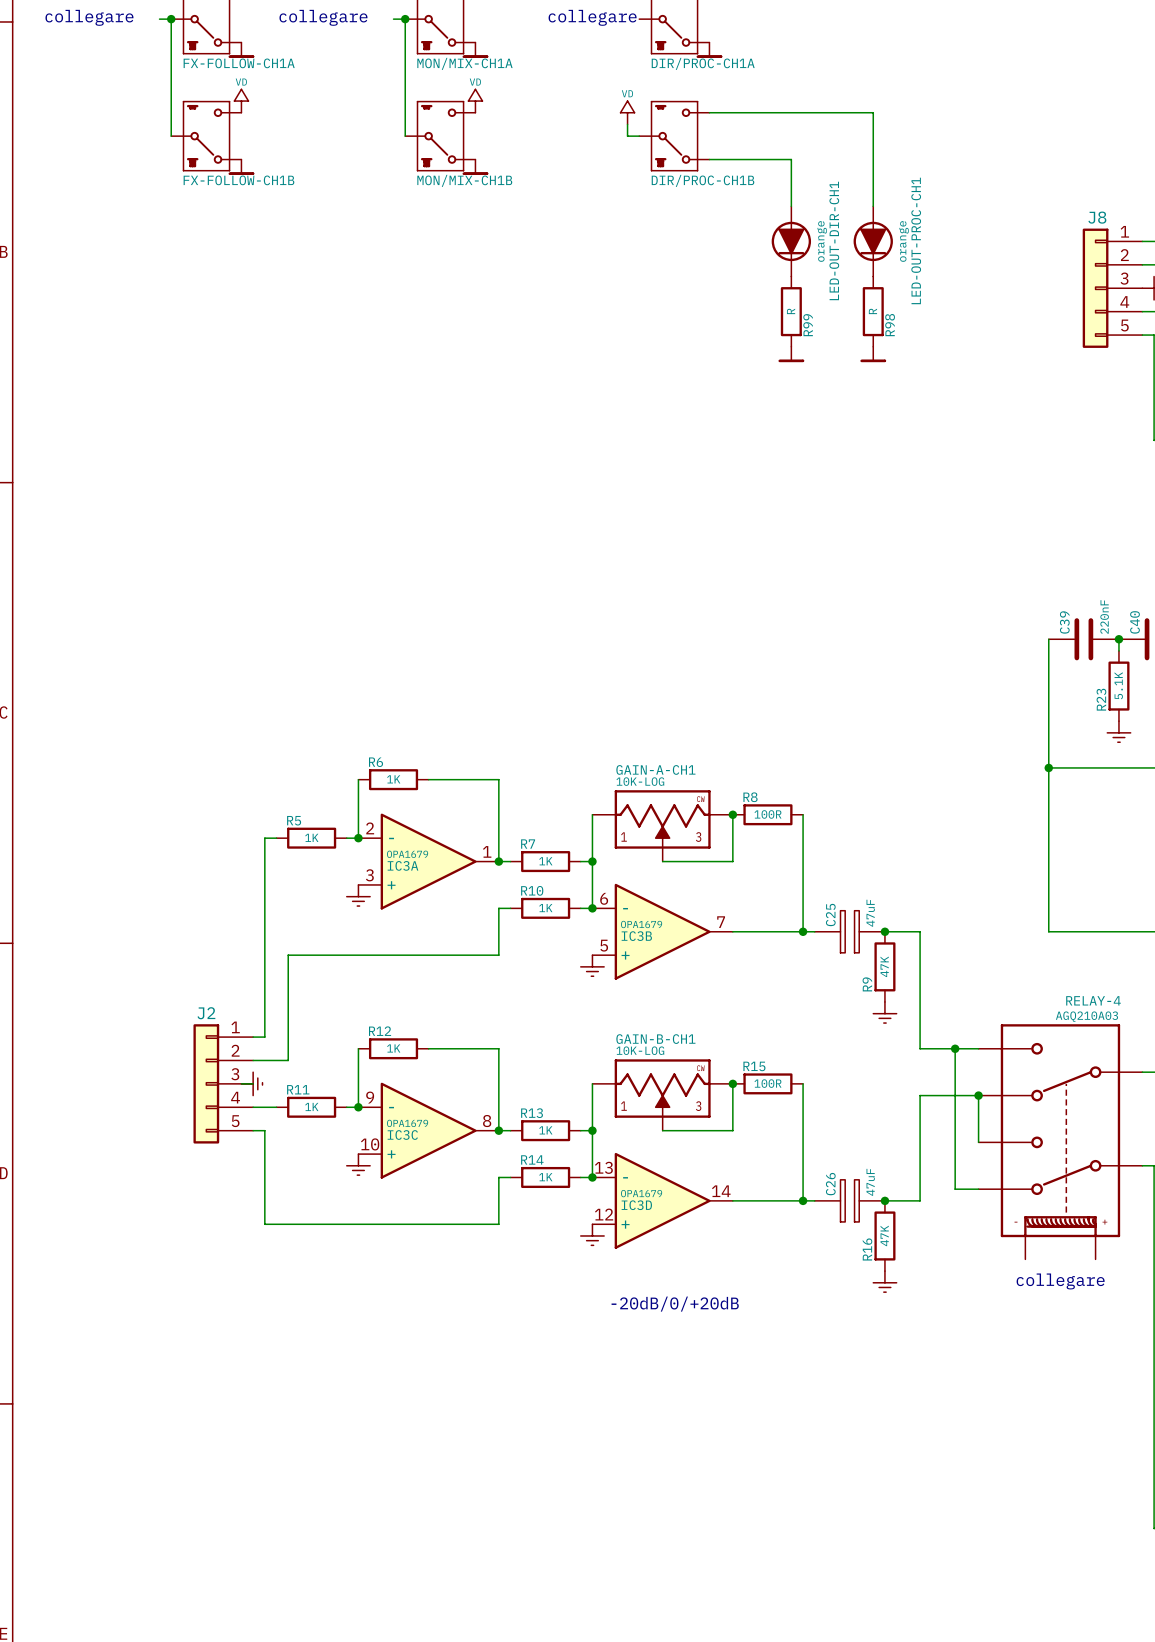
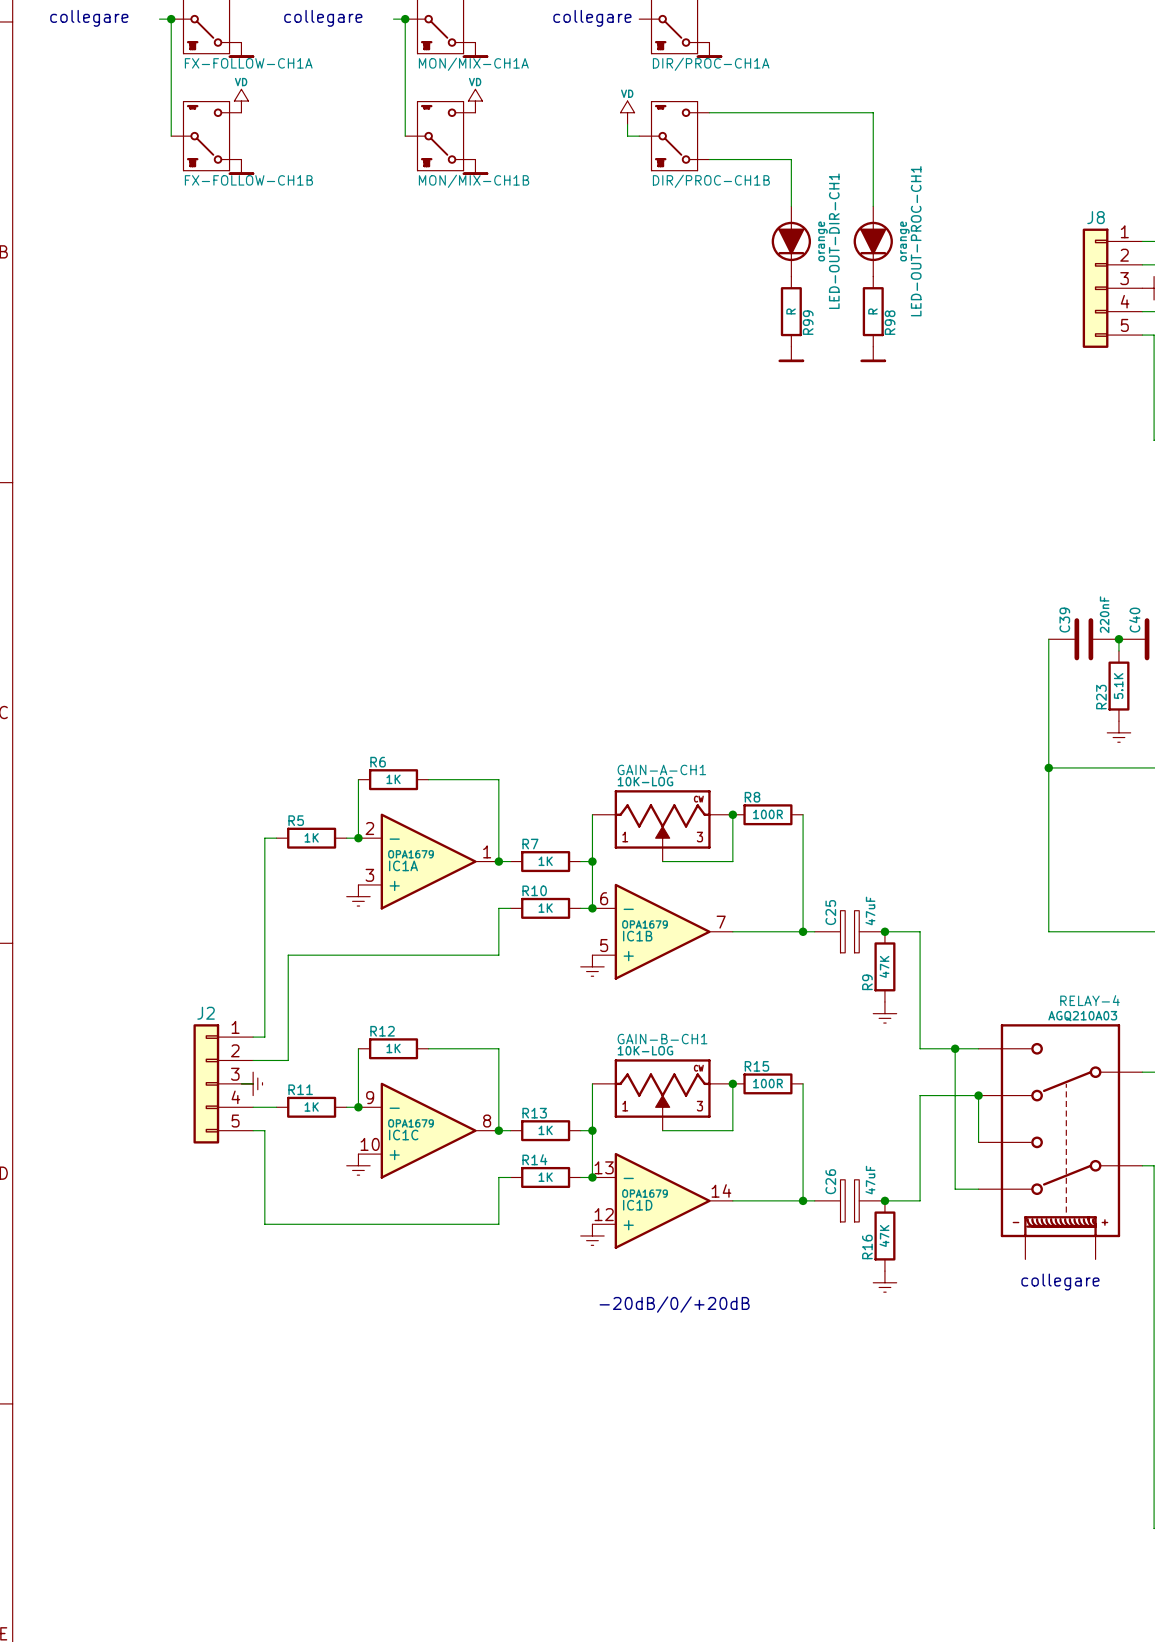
IC3A name: IC3A (402, 865) -> IC1A (403, 865)
IC3B name: IC3B (636, 936) -> IC1B (637, 936)
IC3C name: IC3C (402, 1135) -> IC1C (403, 1135)
IC3D name: IC3D (636, 1205) -> IC1D (637, 1205)

